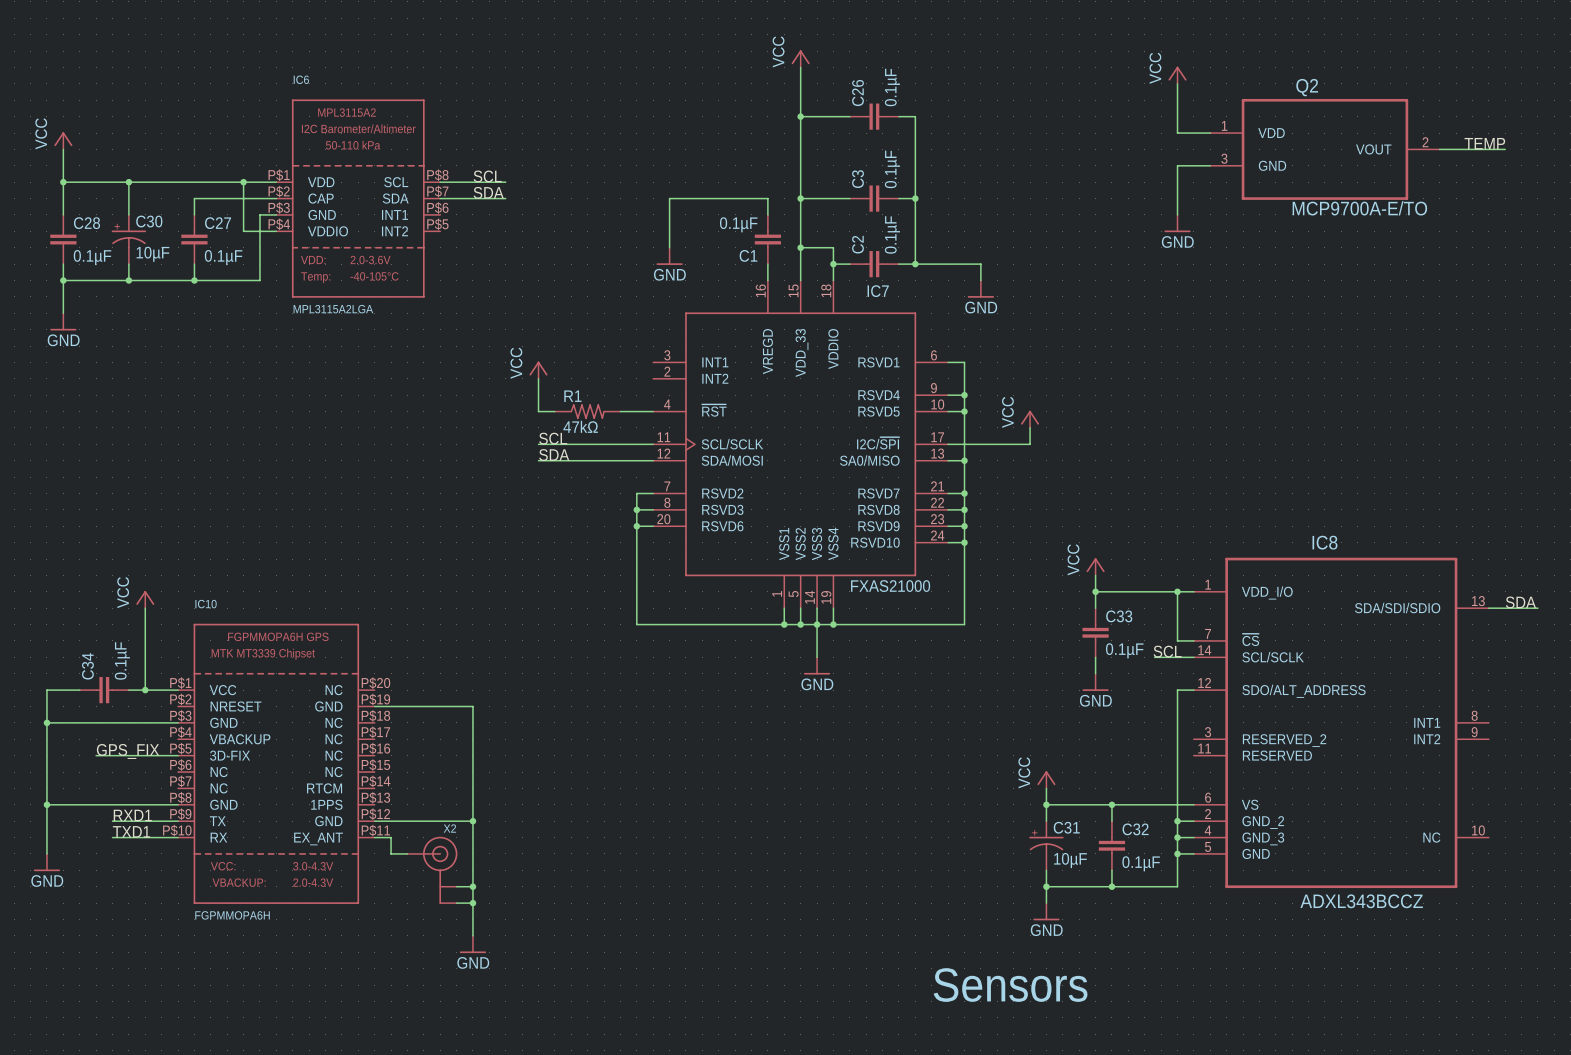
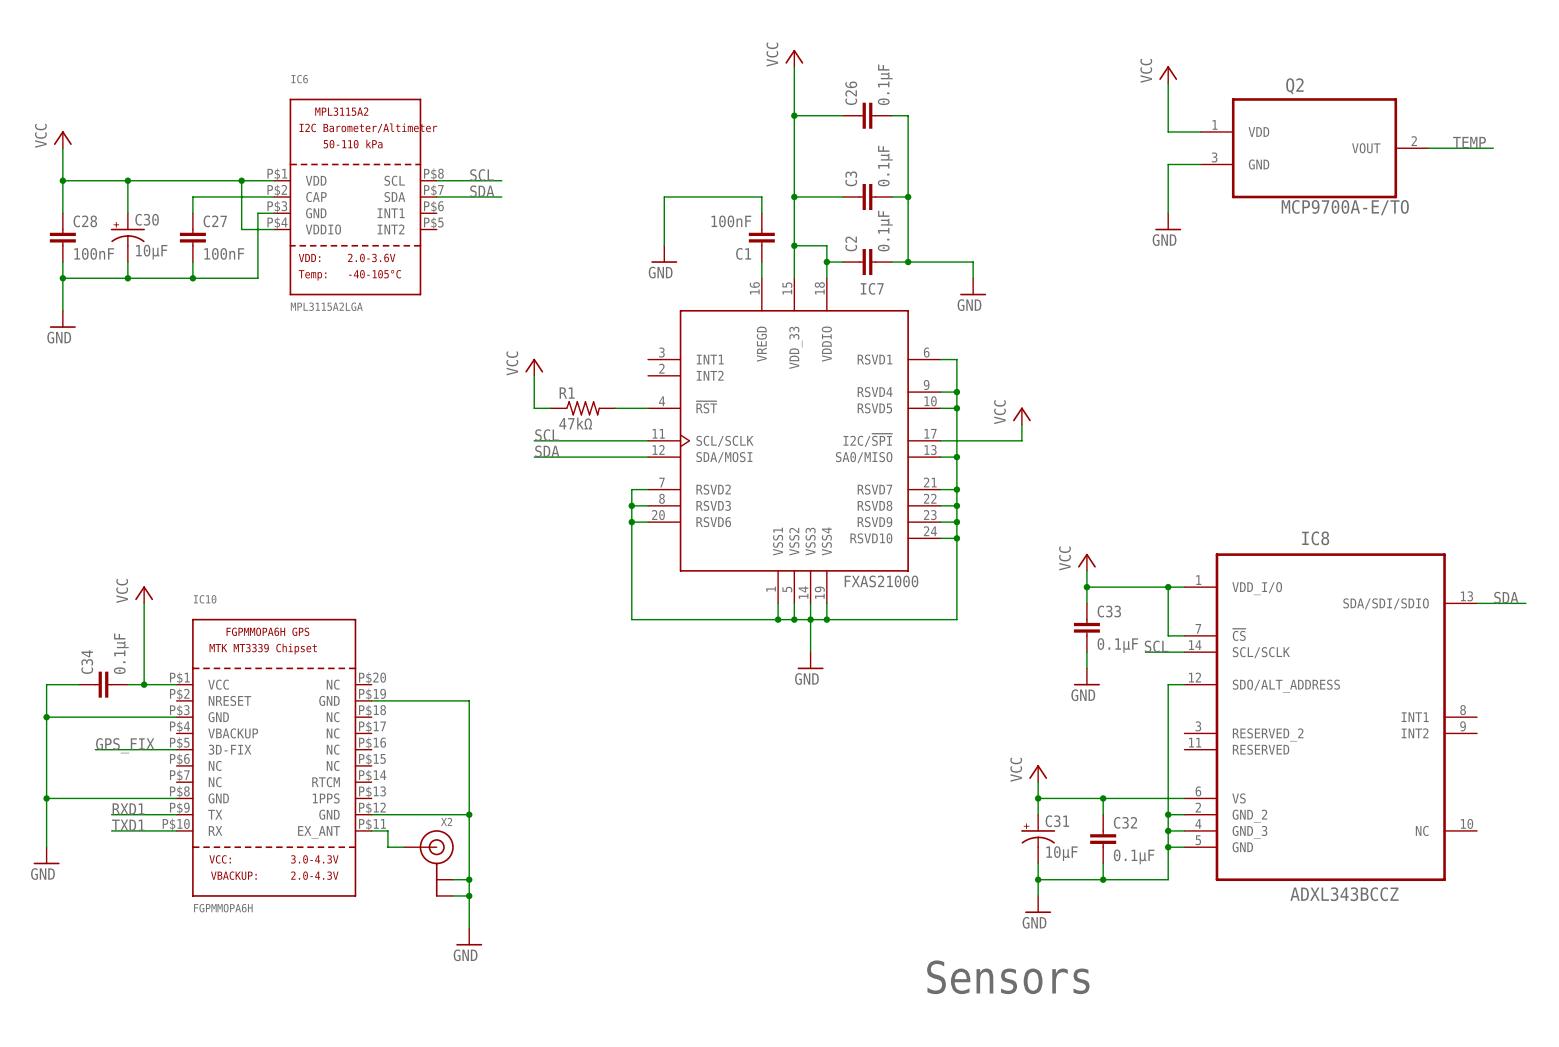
C1 value: 0.1µF (738, 224) -> 100nF (731, 221)
C28 value: 0.1µF (92, 257) -> 100nF (94, 253)
C27 value: 0.1µF (223, 257) -> 100nF (224, 253)

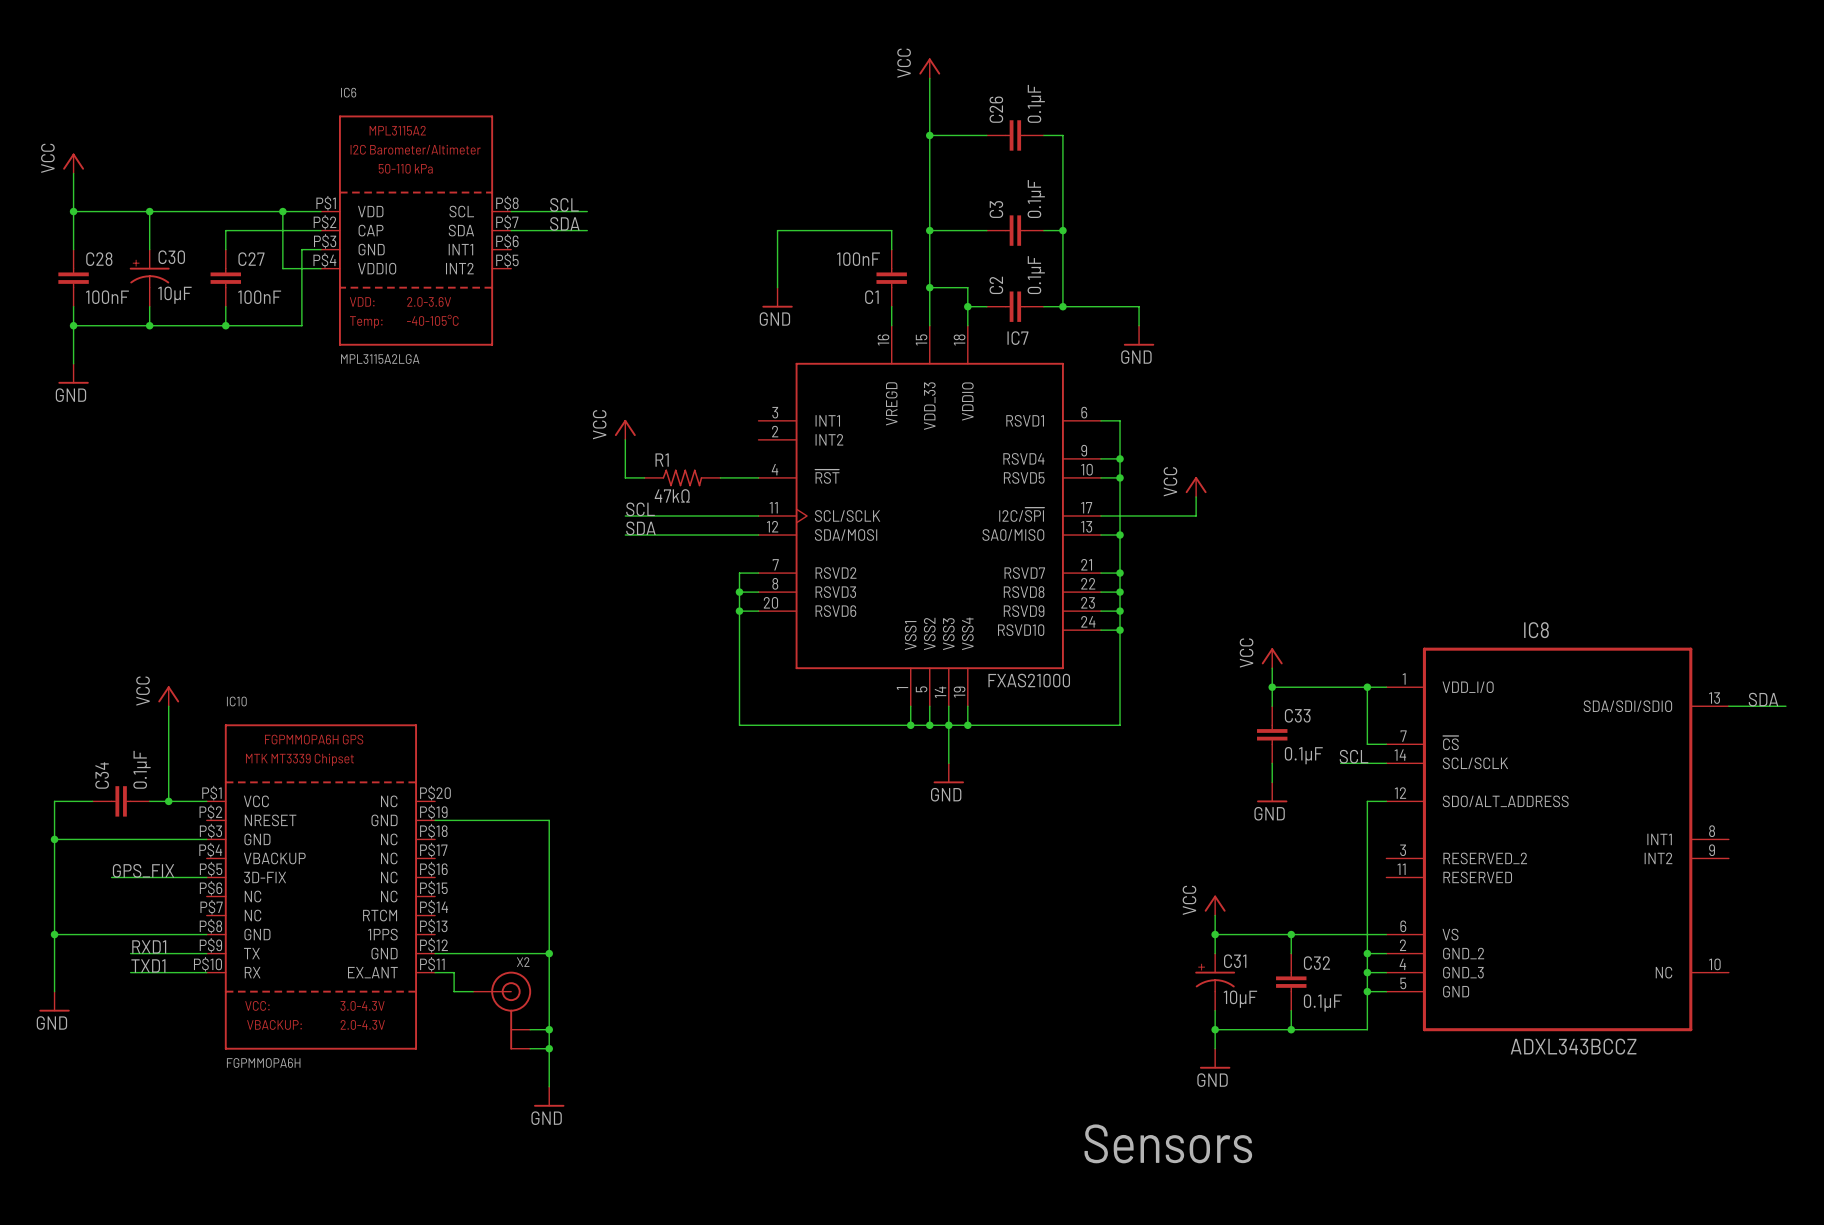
power symbol: VCC (1168, 74) -> none
wire: (1168, 83) (1168, 131) (1200, 131) -> none
label: TEMP (1469, 142) -> none
Q2: MCP9700A-E/TO (1314, 148) -> none
wire: (1428, 148) (1493, 148) -> none
wire: (1200, 164) (1168, 164) (1168, 213) -> none
power symbol: GND (1168, 221) -> none

